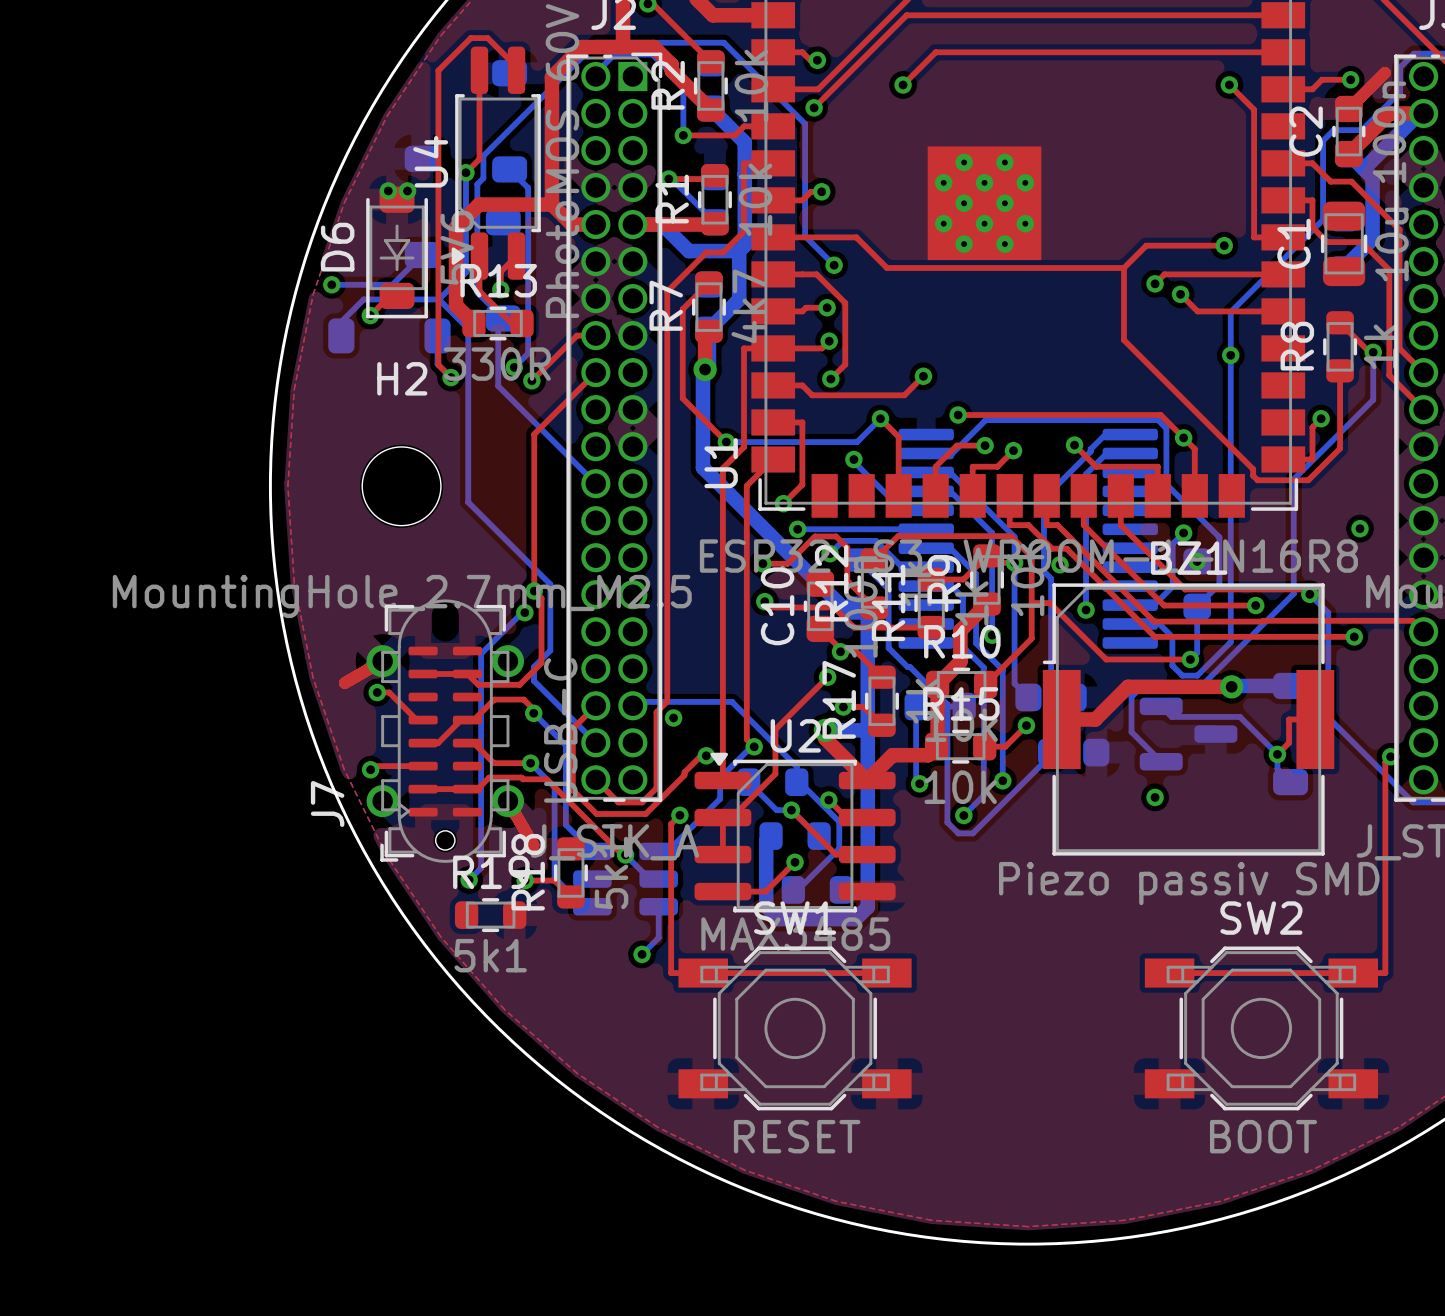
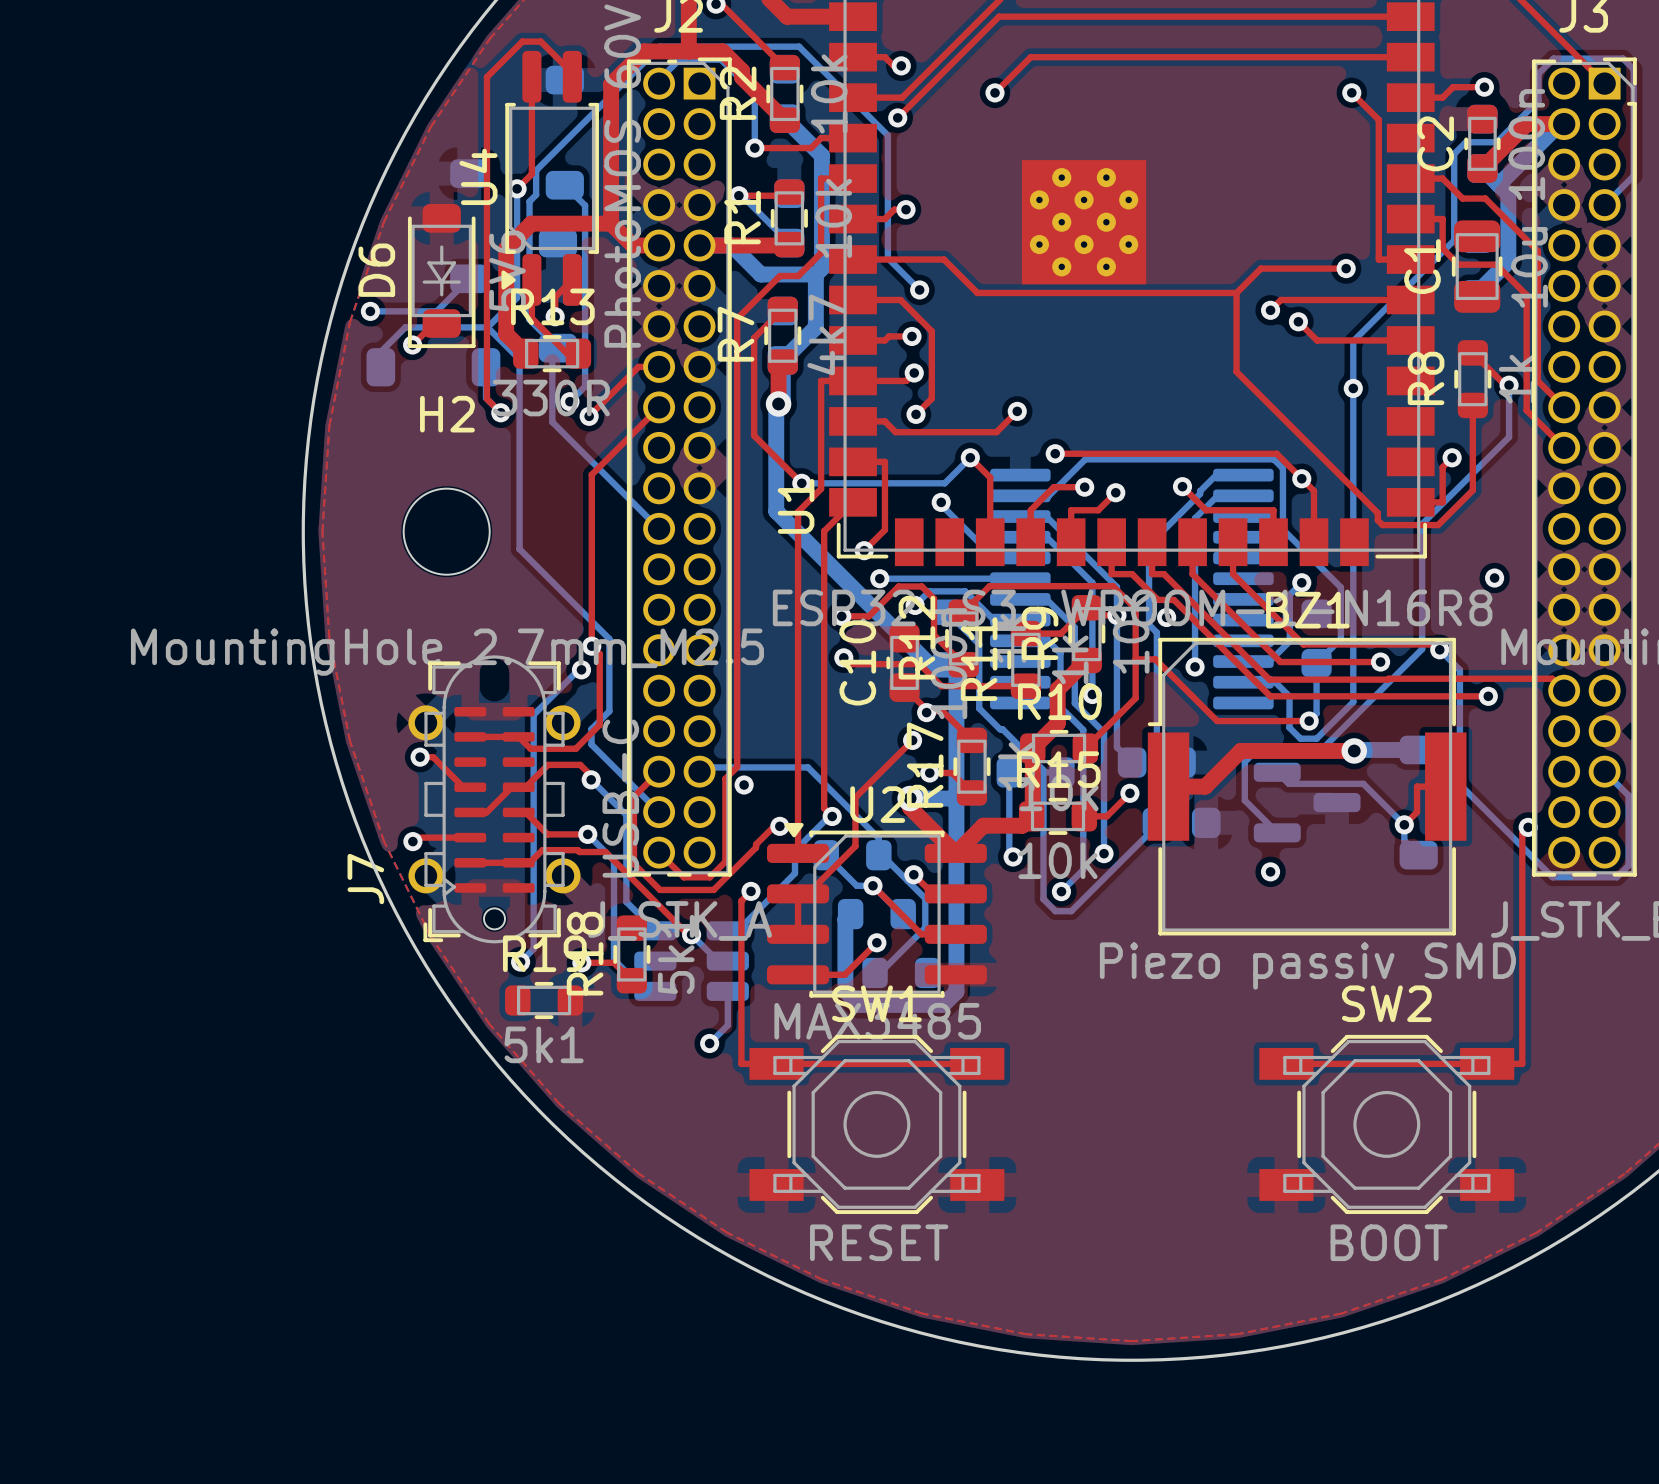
top track: (1384, 72) (1348, 108) -> none
via: (388, 190) -> none
via: (407, 190) -> none
via: (1197, 561) -> none
top track: (382, 661) (344, 683) -> none
top track: (507, 801) (533, 845) -> none

